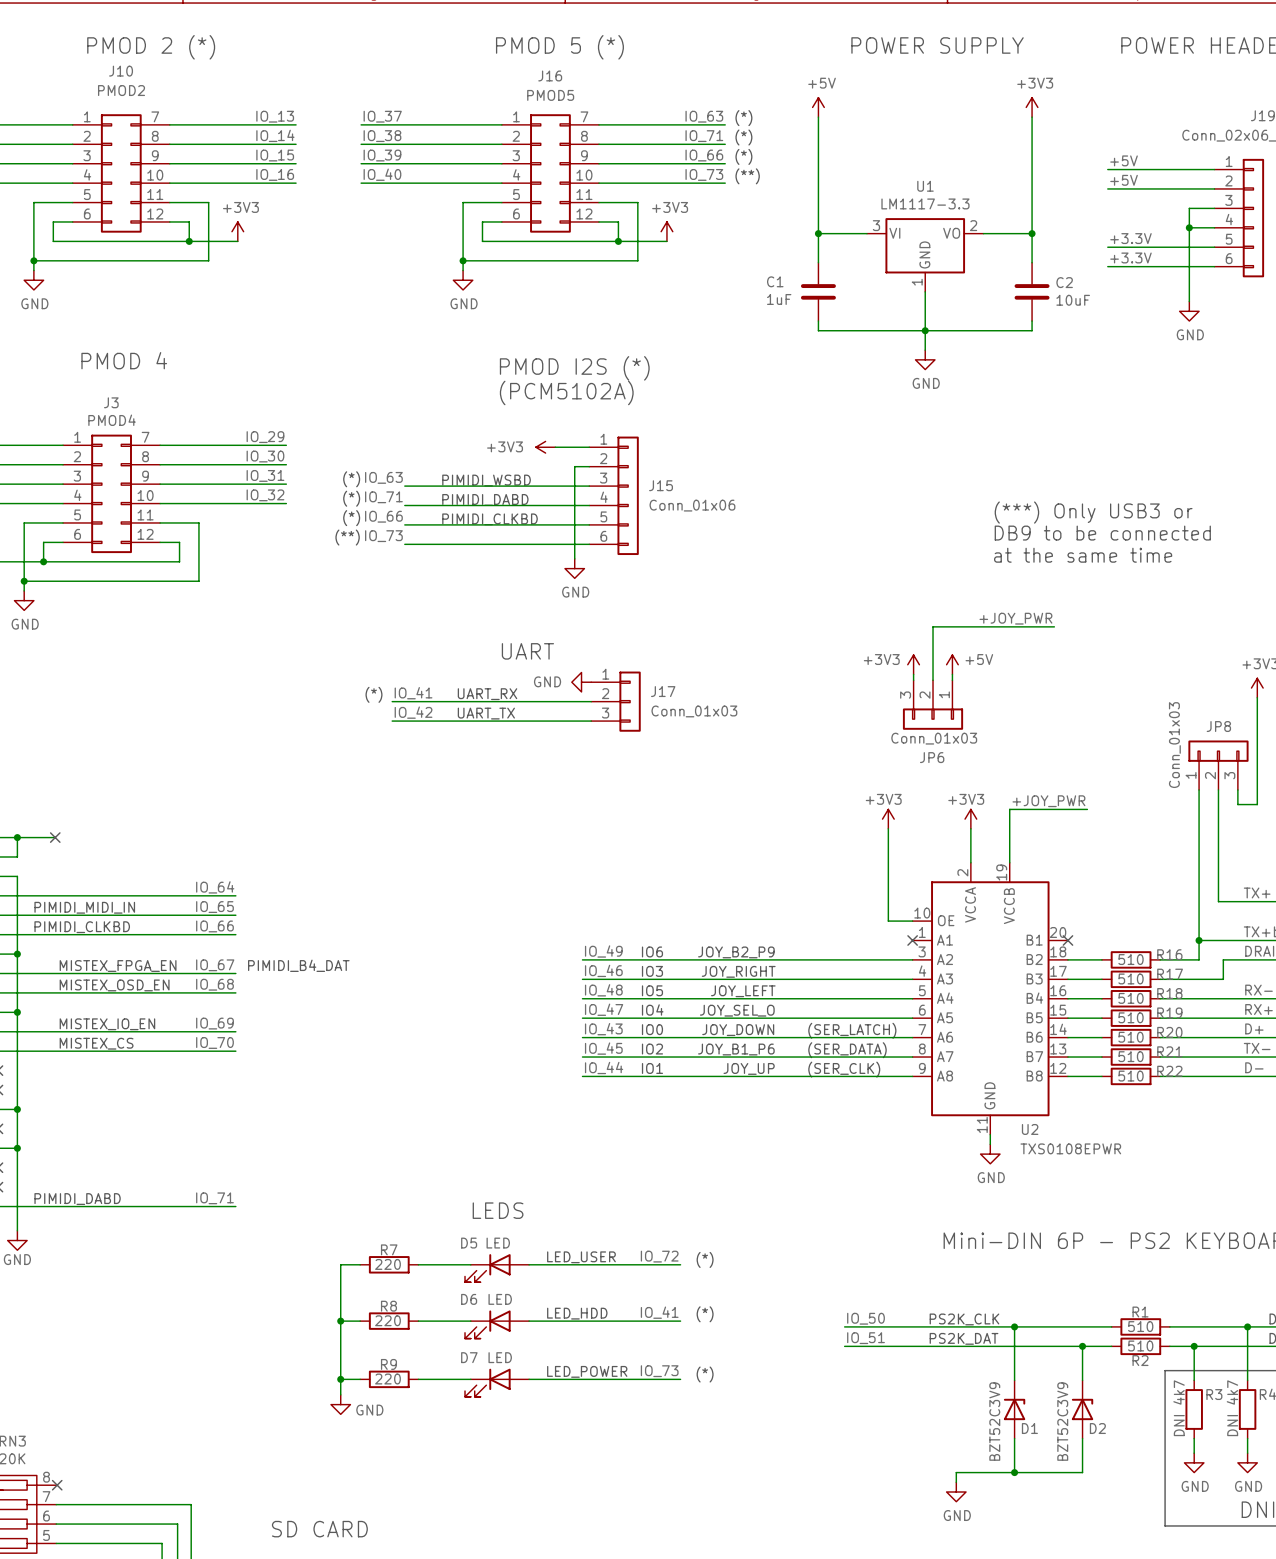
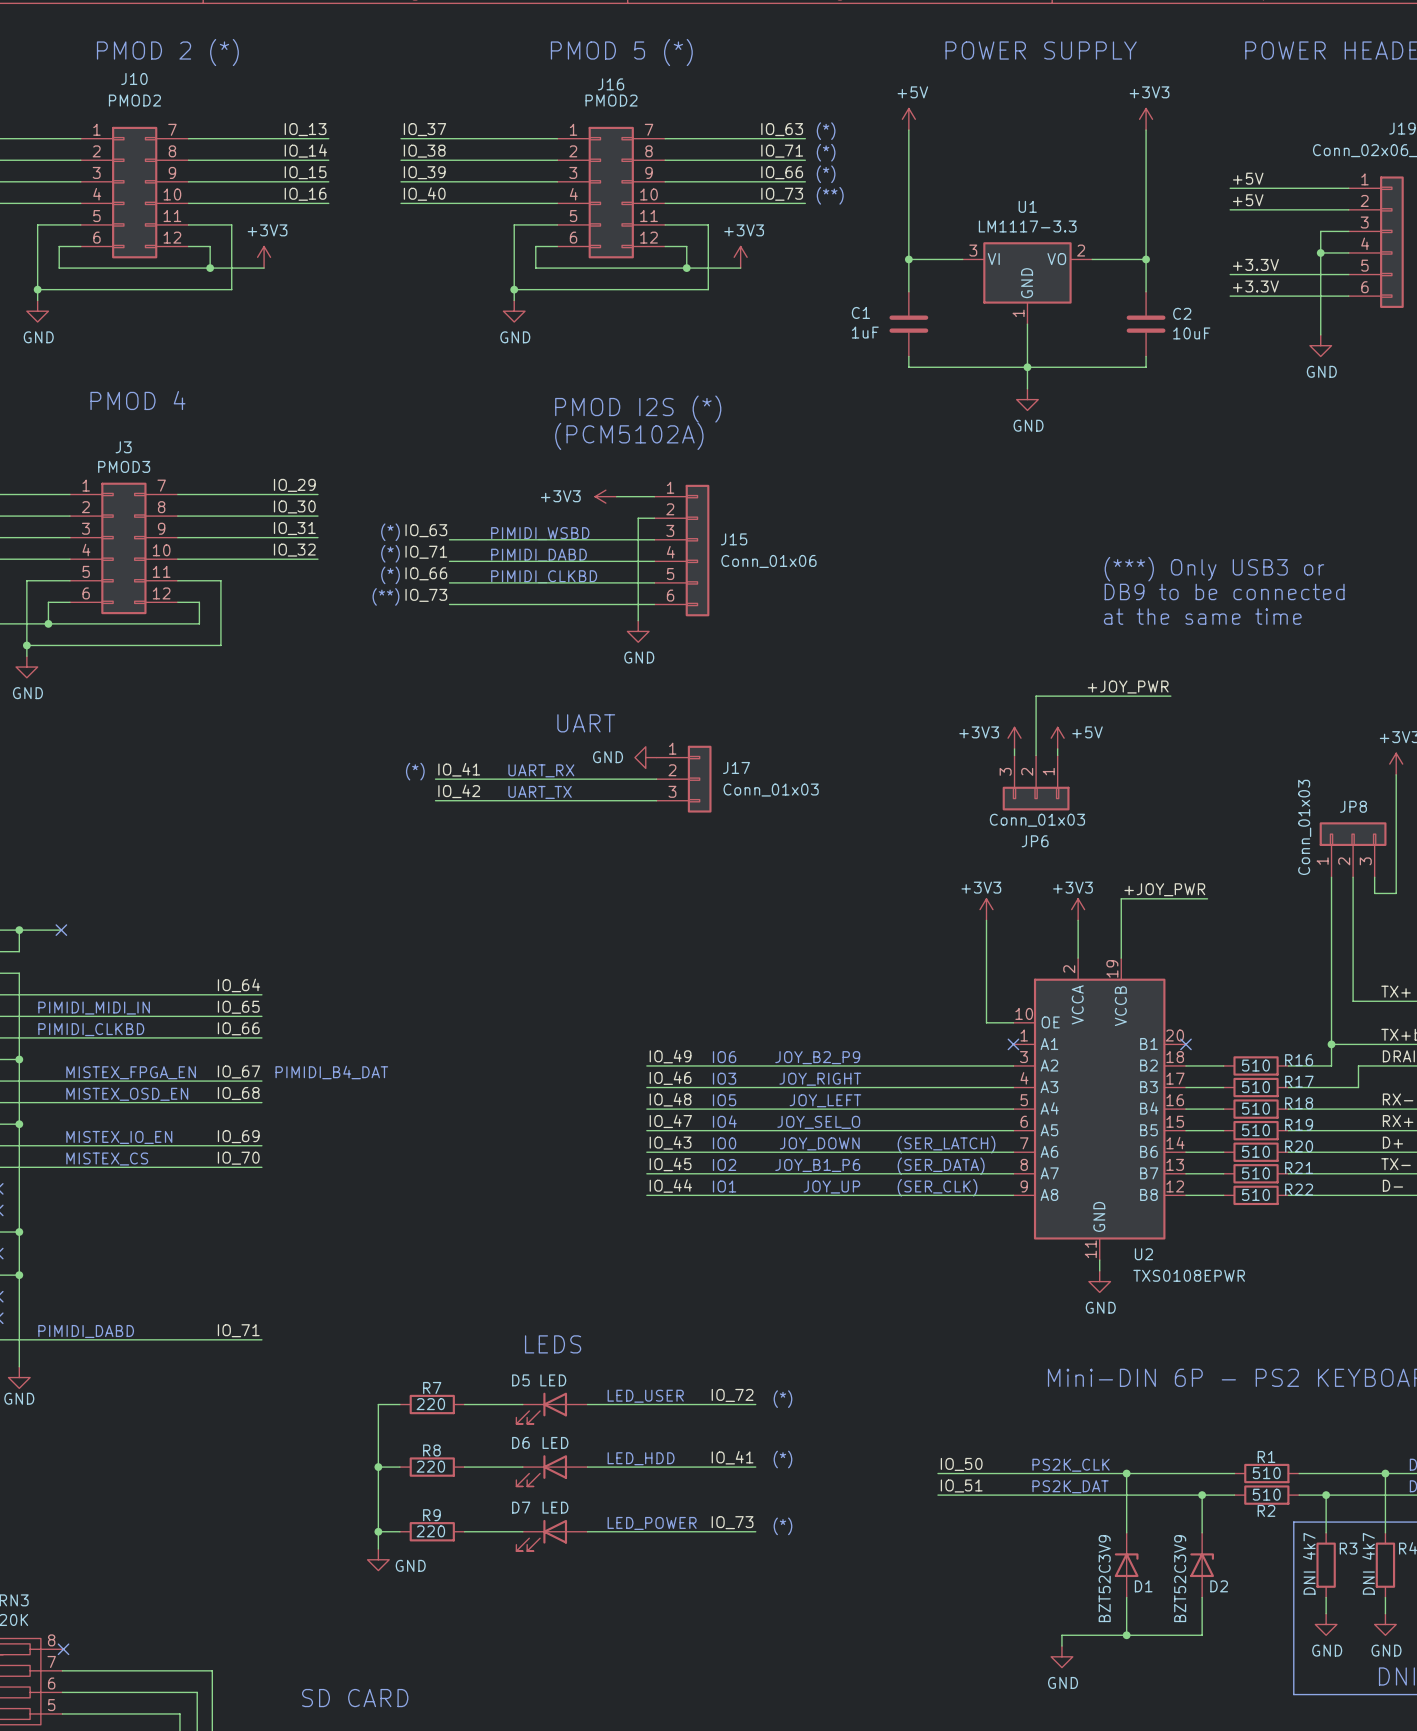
J16 value: PMOD5 (550, 95) -> PMOD2 (611, 100)
J3 value: PMOD4 (112, 420) -> PMOD3 (124, 466)

